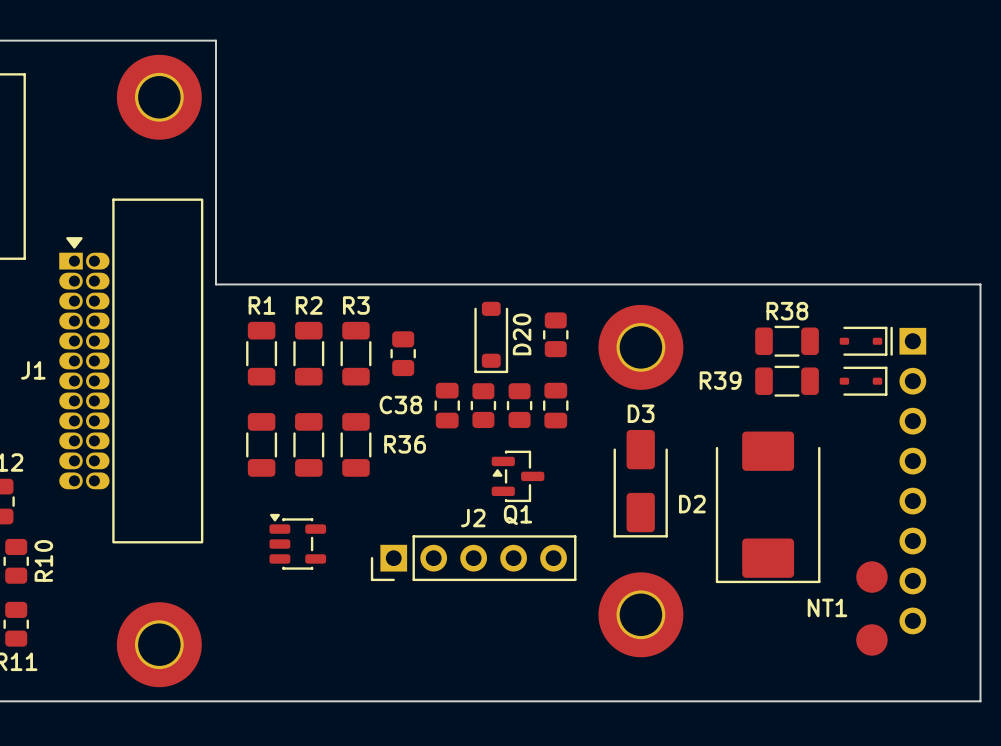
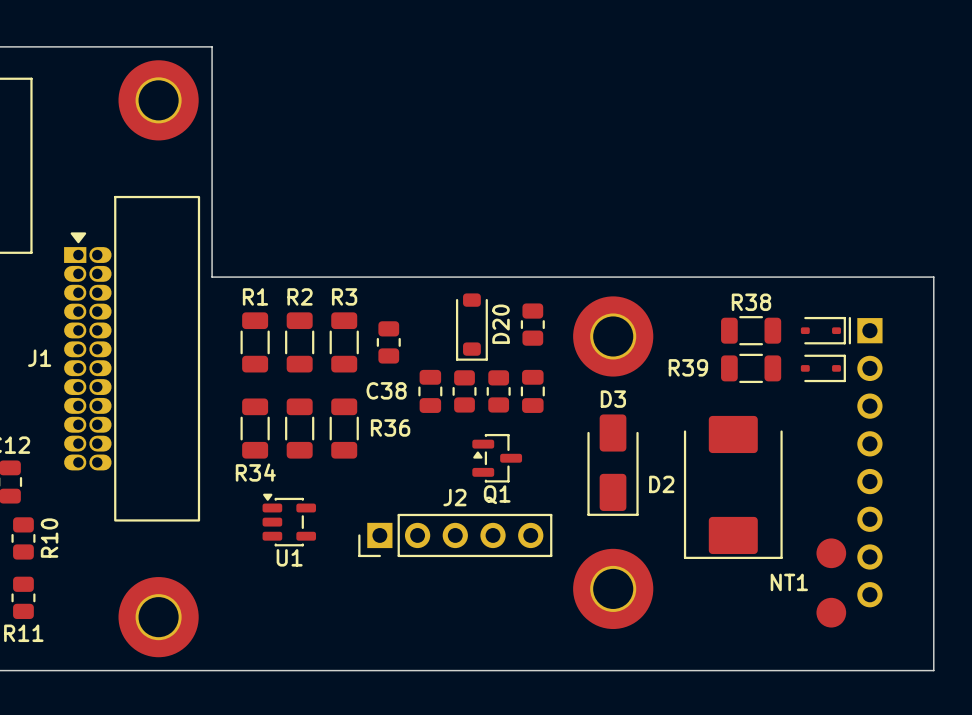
text: none -> R34 (255, 472)
text: none -> U1 (289, 557)

